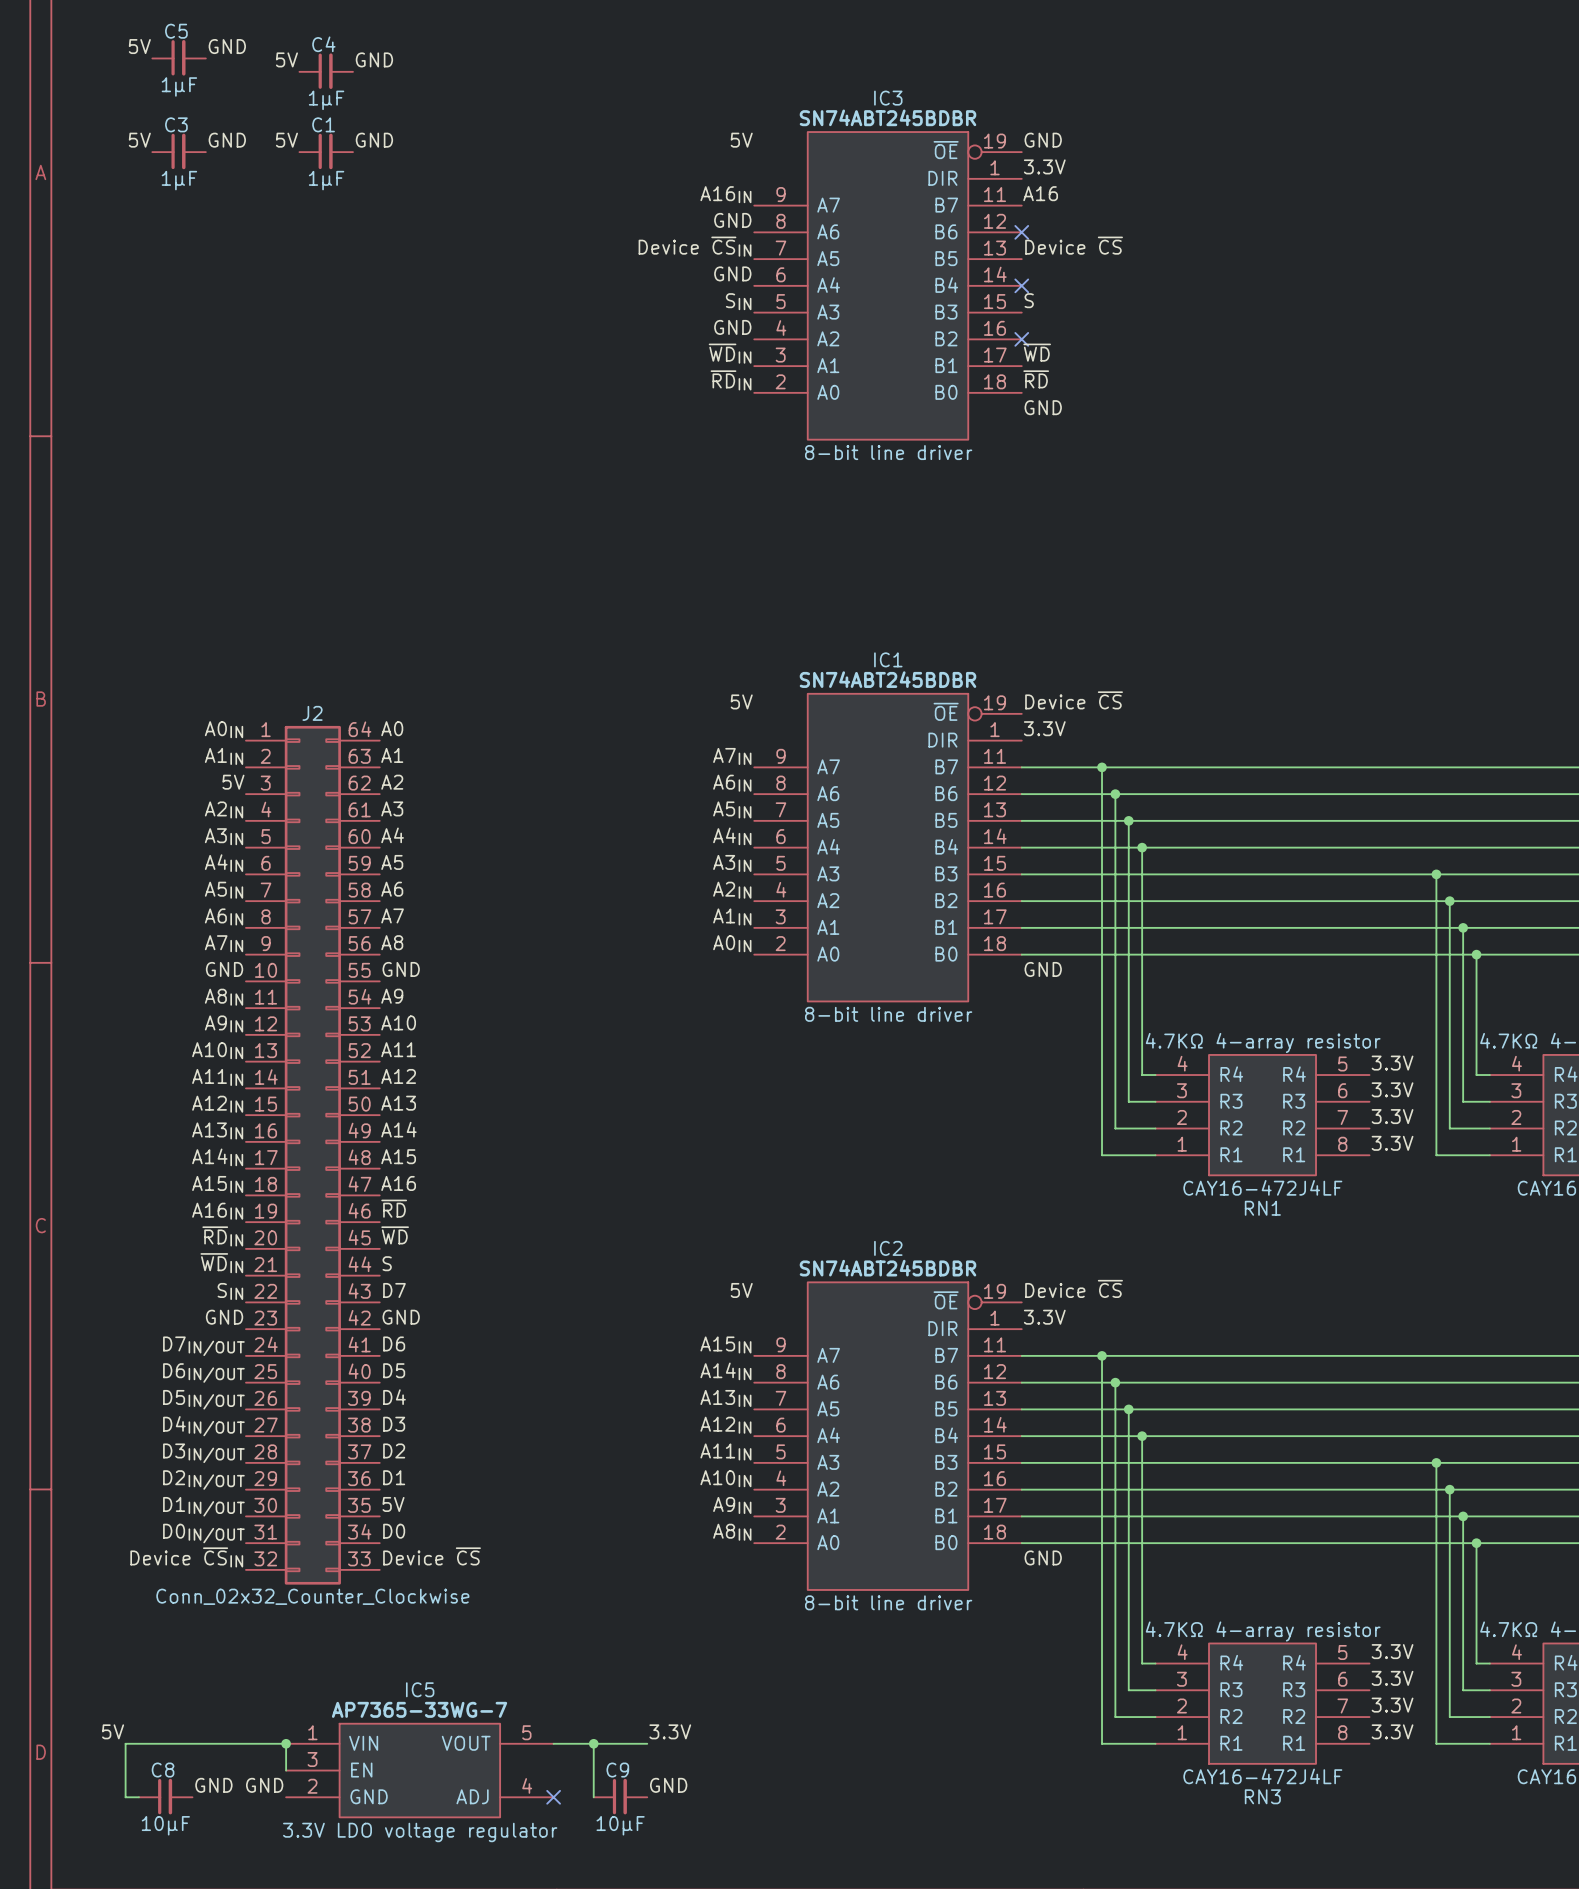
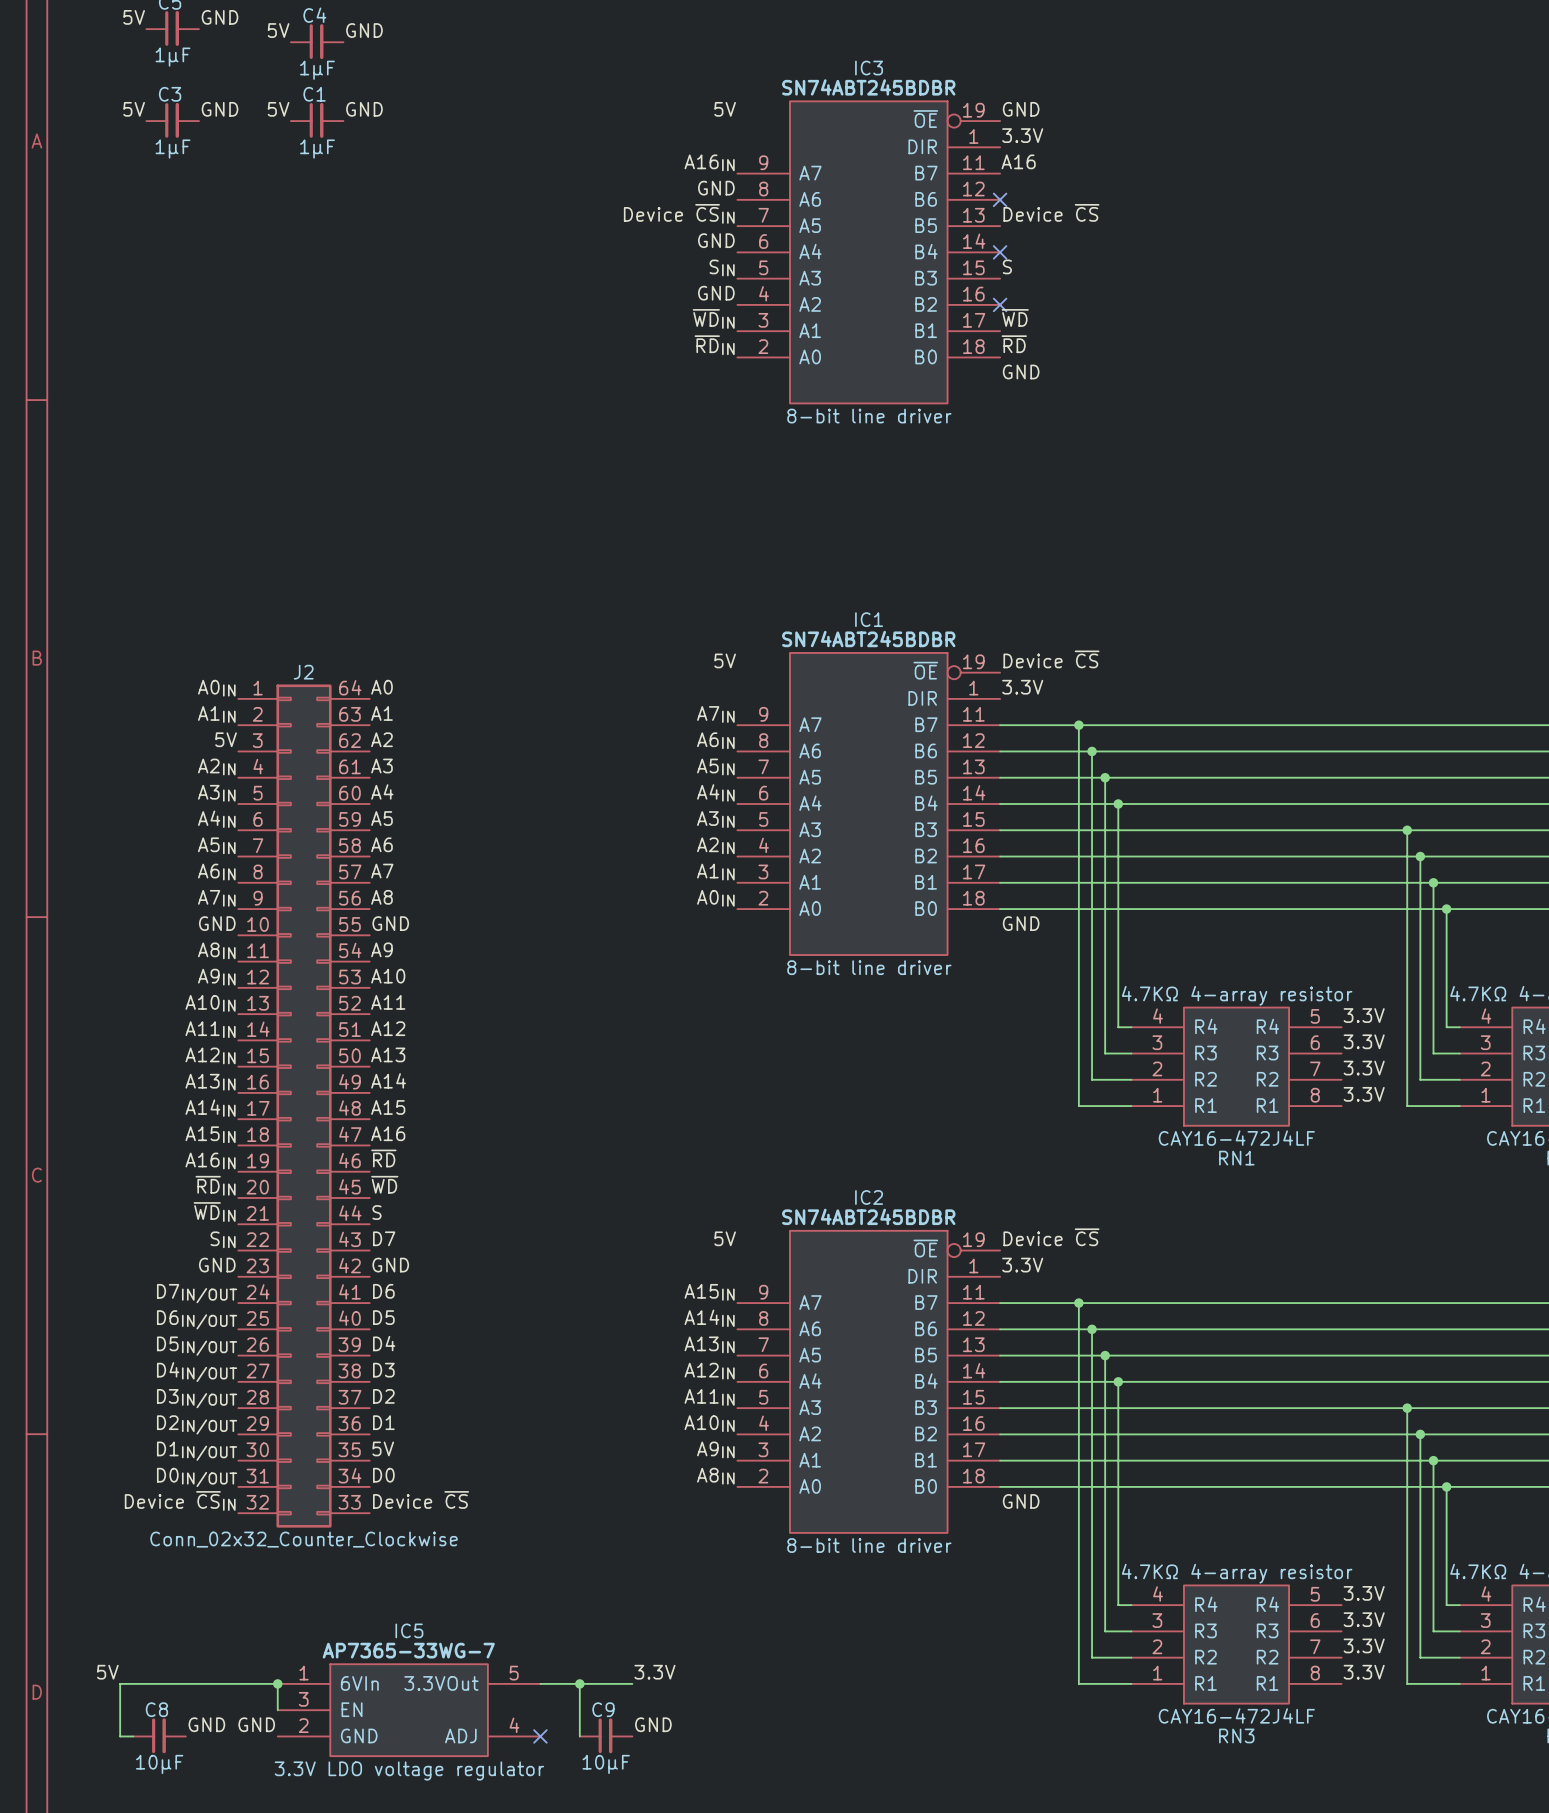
IC5 pin name: VIN (363, 1743) -> 6VIn (359, 1683)
IC5 pin name: VOUT (466, 1743) -> 3.3VOut (441, 1683)

